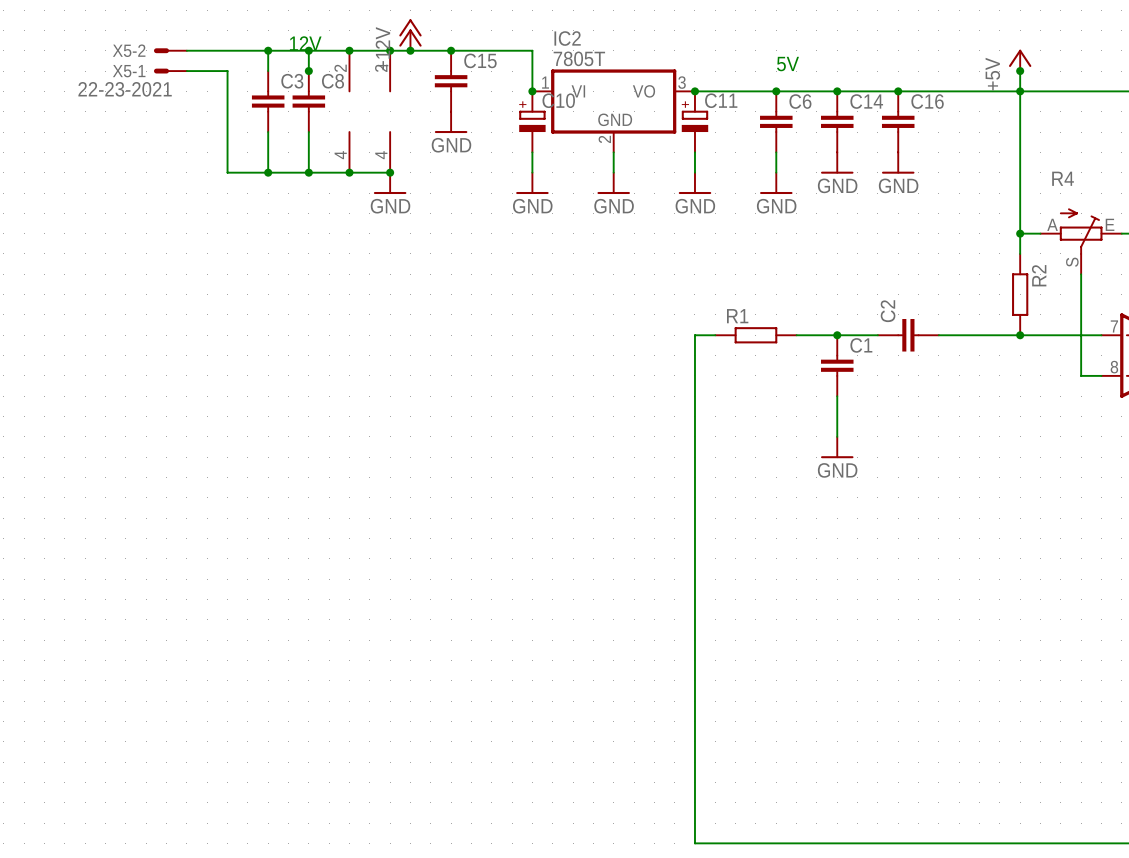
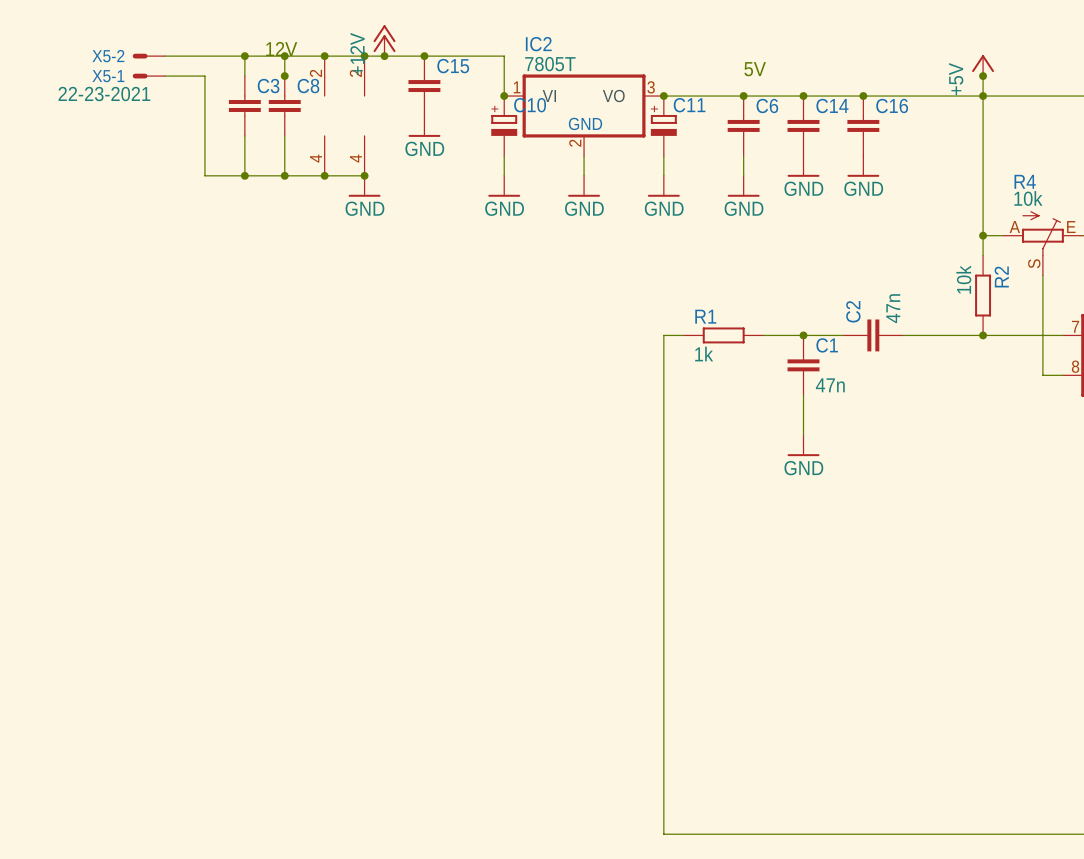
R4 value: none -> 10k (1028, 198)
R2 value: none -> 10k (963, 279)
C2 value: none -> 47n (893, 308)
R1 value: none -> 1k (704, 354)
C1 value: none -> 47n (830, 385)

